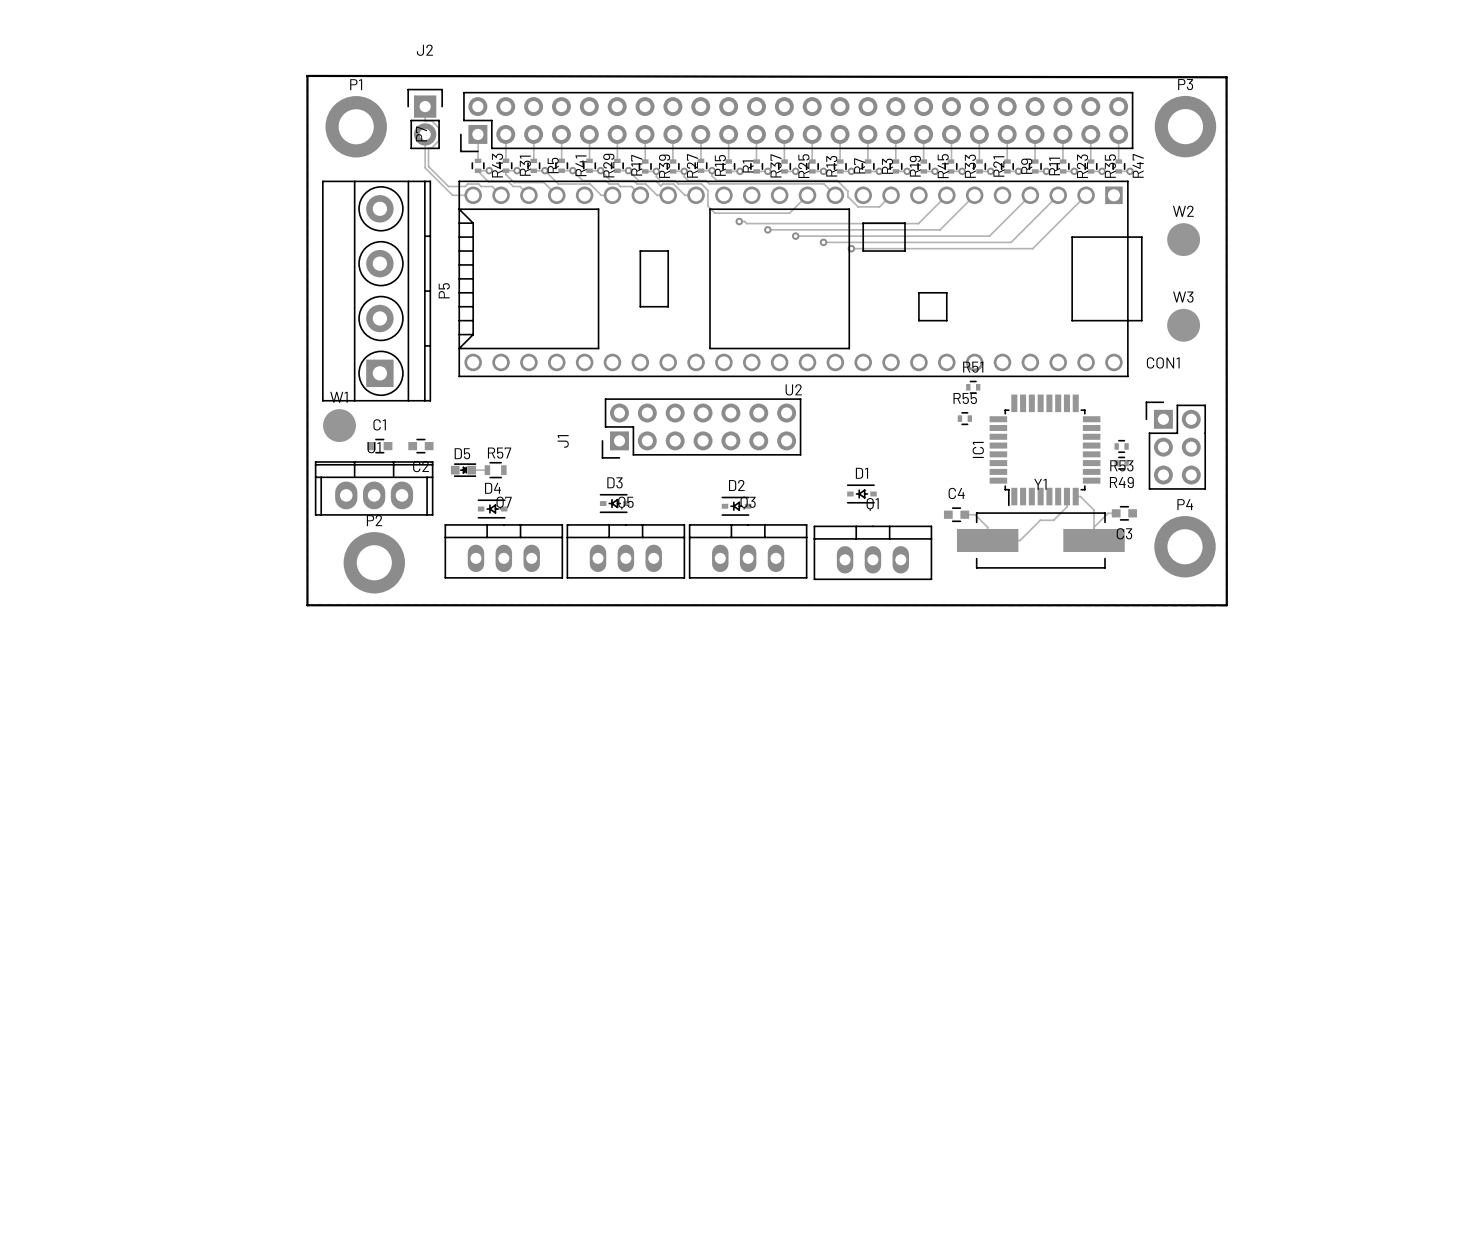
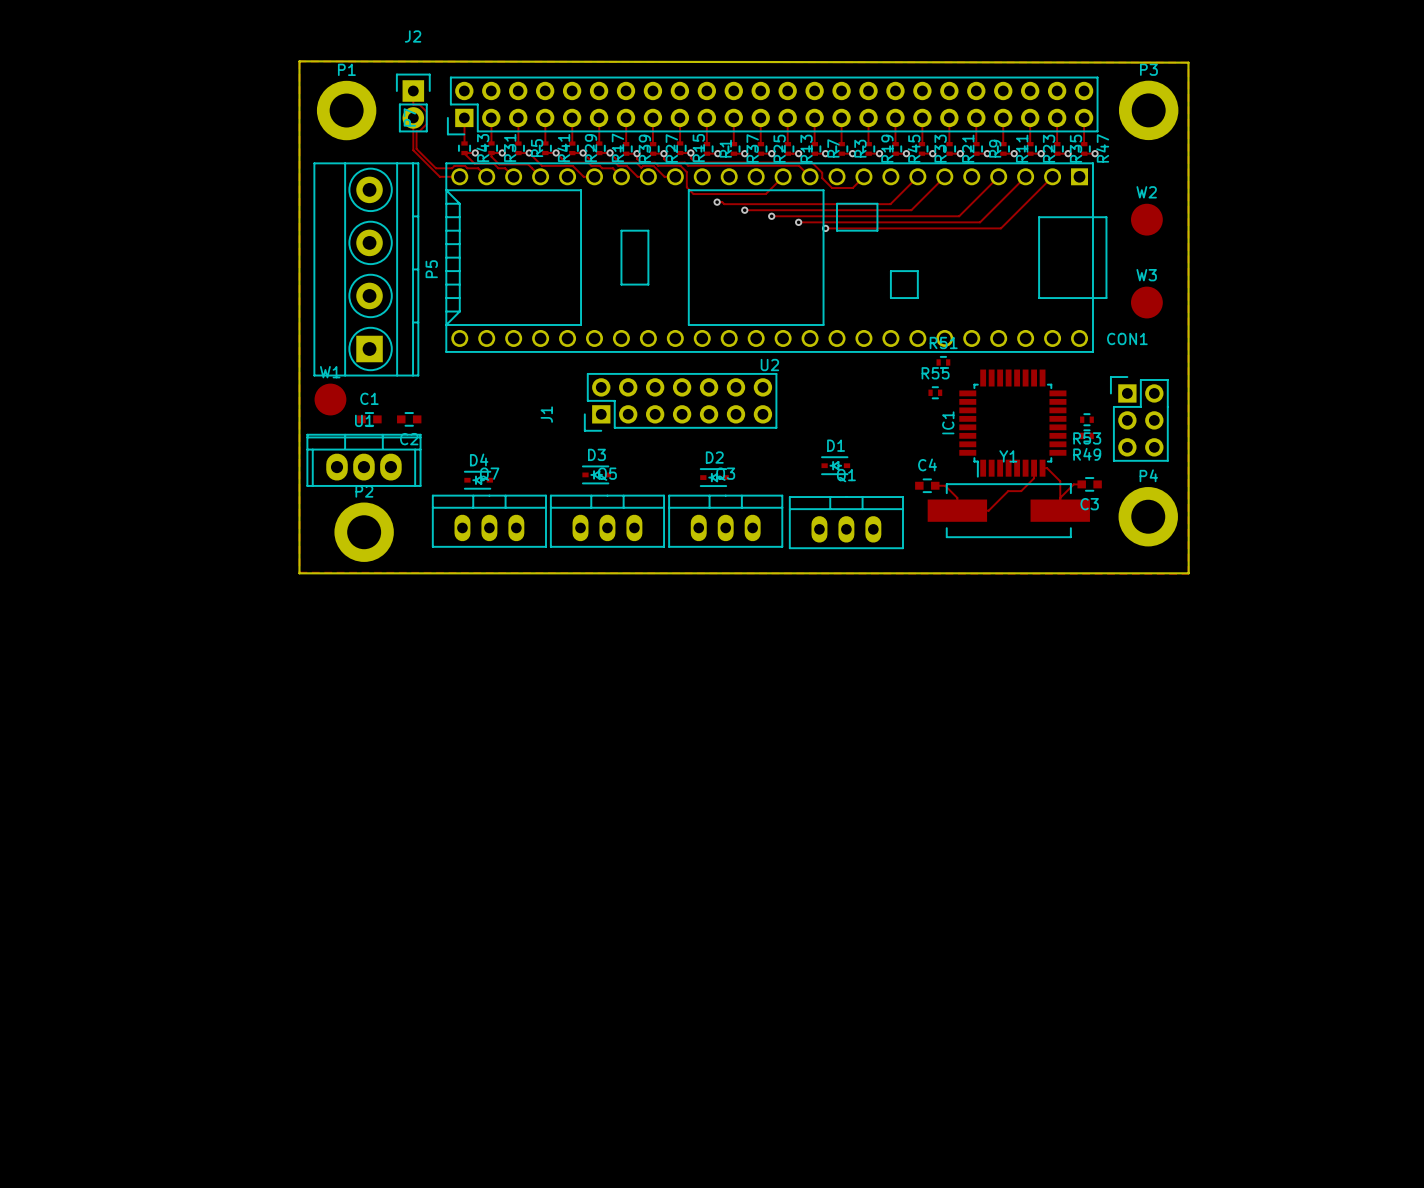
D5: (463, 470) -> none
track: (471, 470) (487, 470) -> none
R57: (495, 470) -> none

